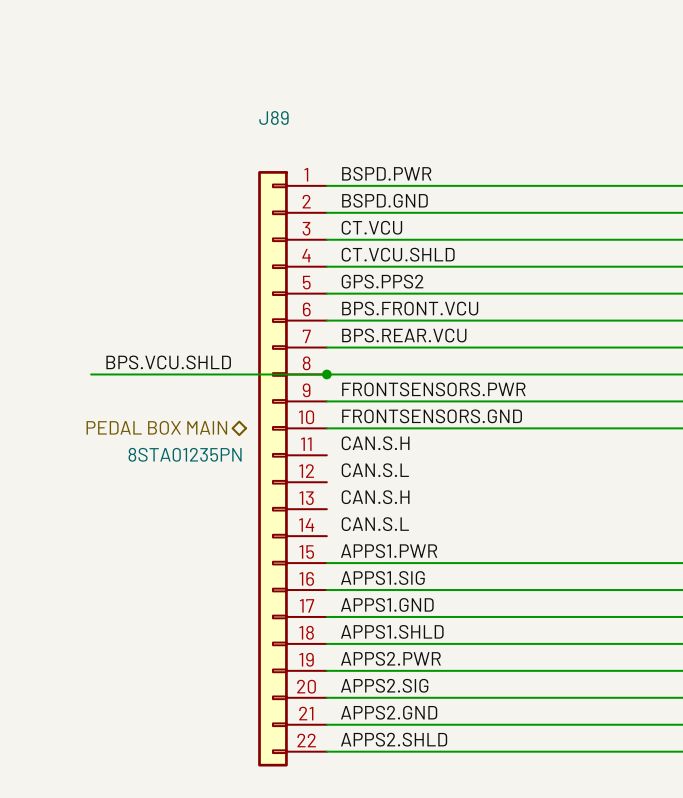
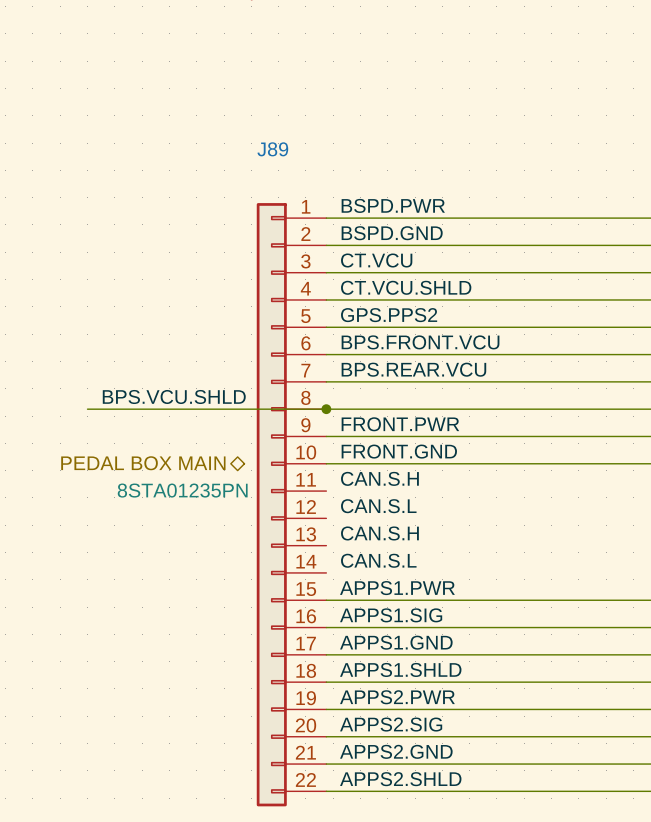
label: FRONTSENSORS.PWR (433, 389) -> FRONT.PWR (400, 424)
label: FRONTSENSORS.GND (432, 416) -> FRONT.GND (399, 451)

